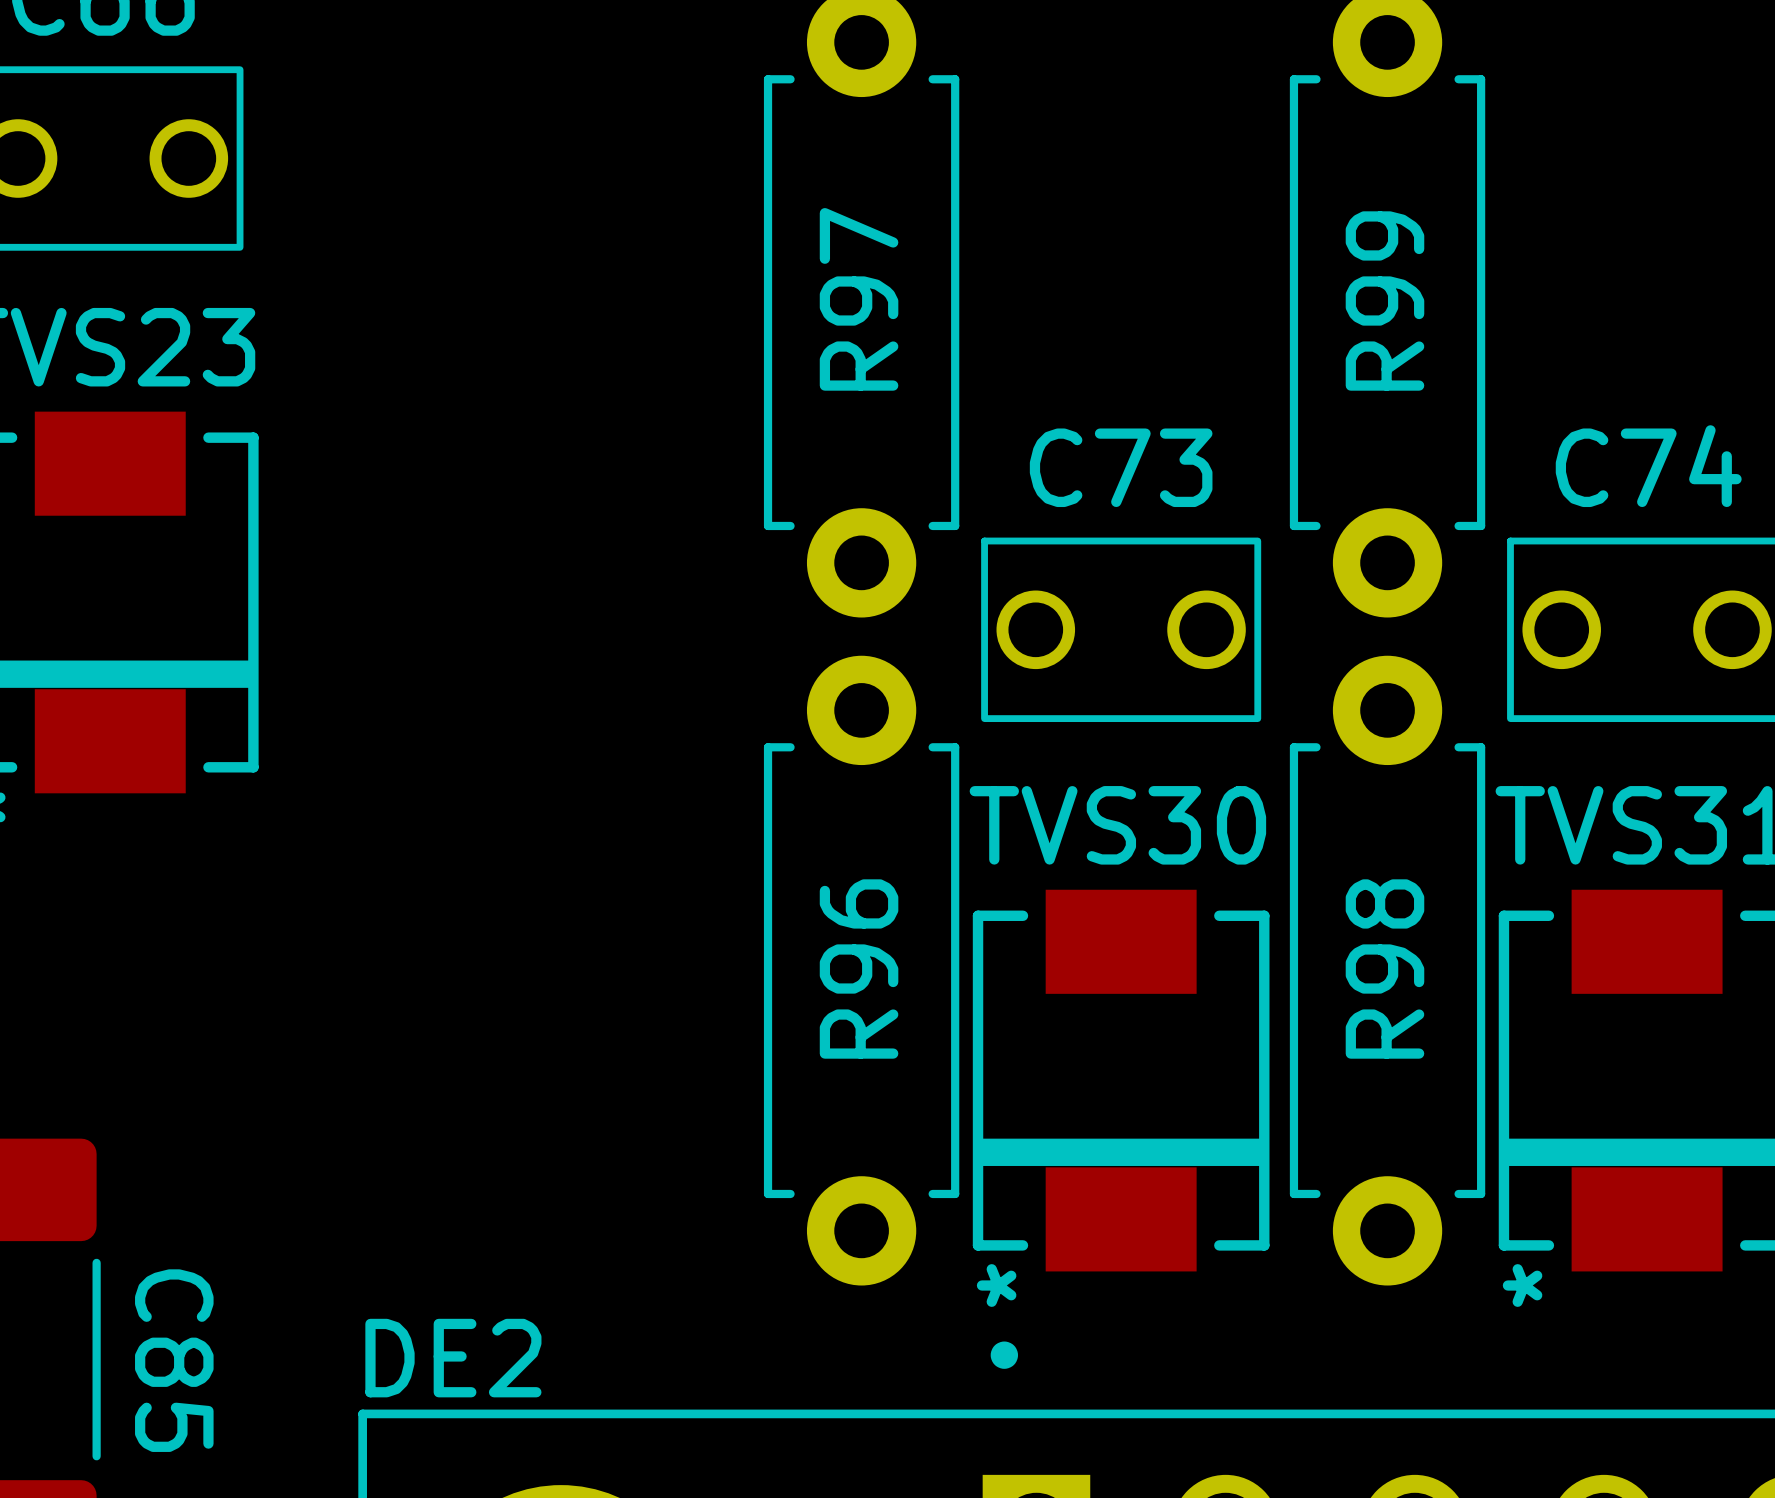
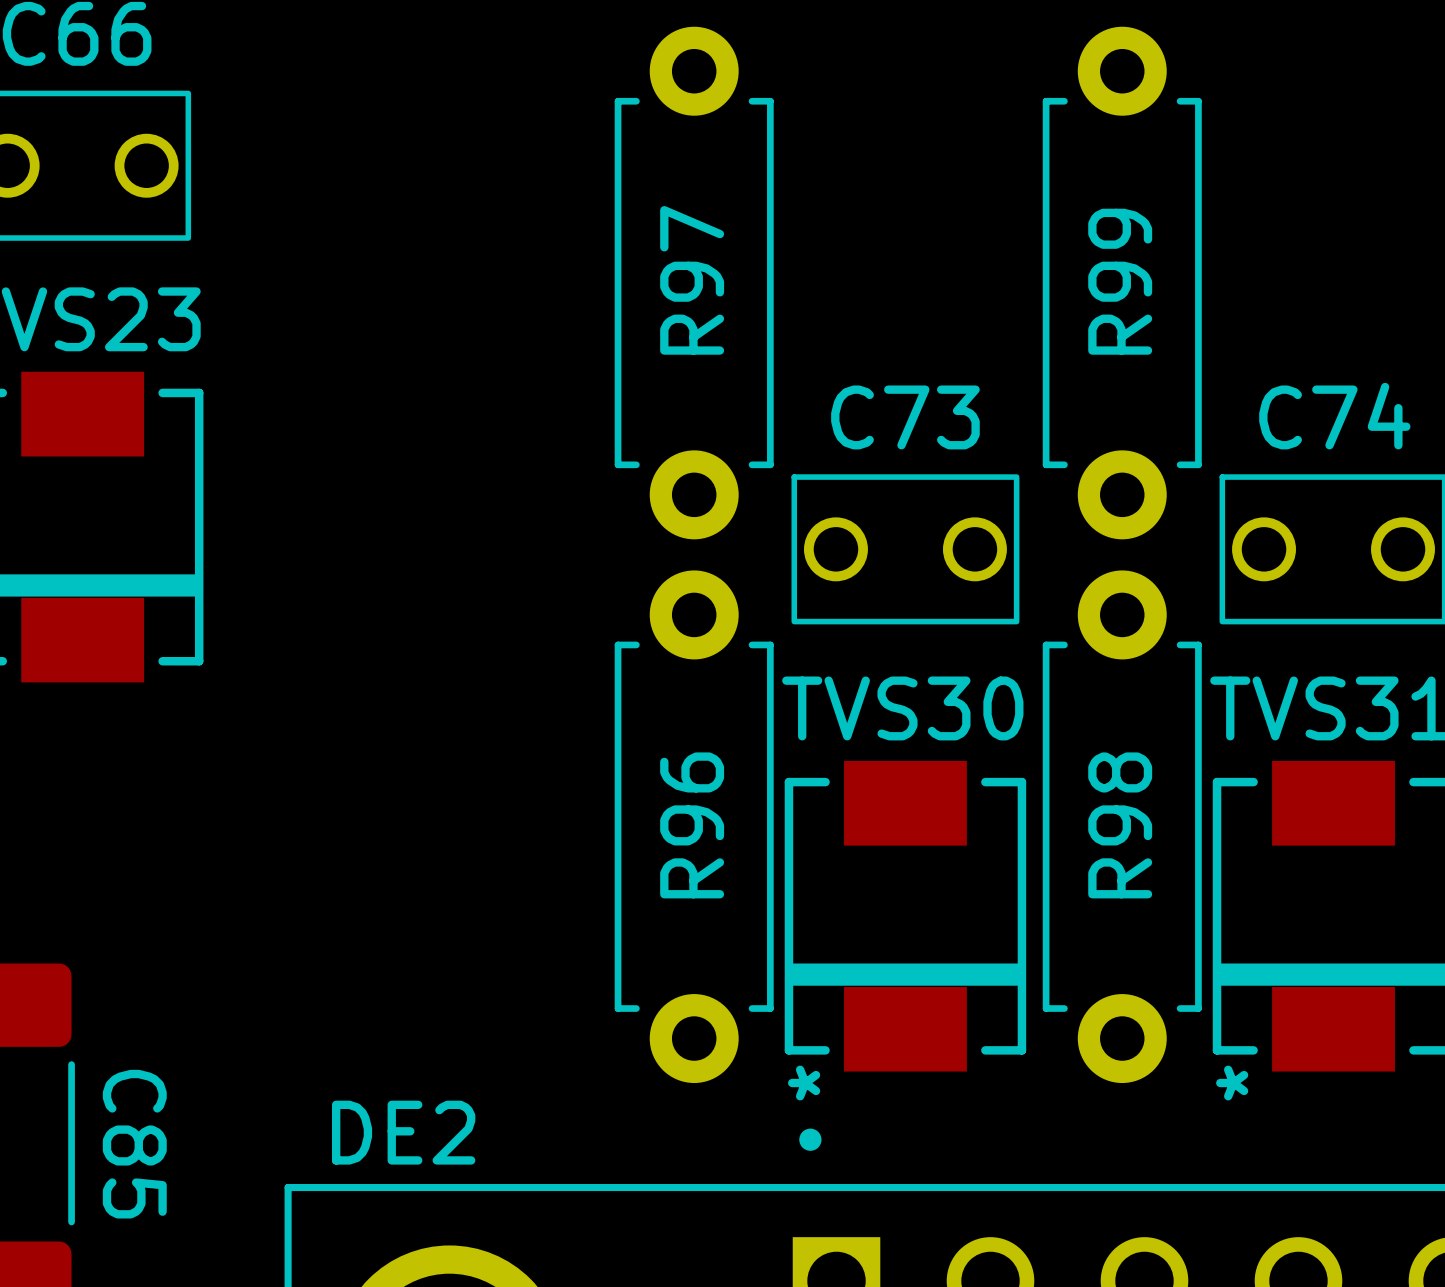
DE2 name position: DE2 (453, 1358) -> DE2 (403, 1132)

